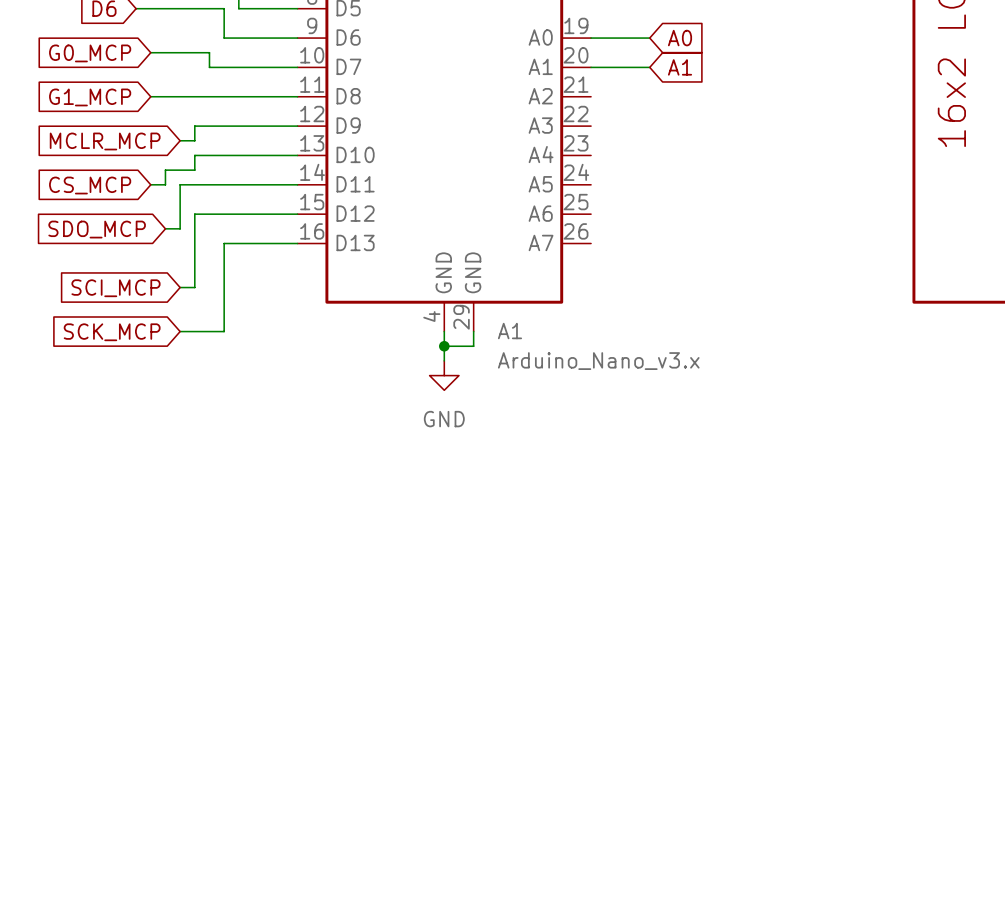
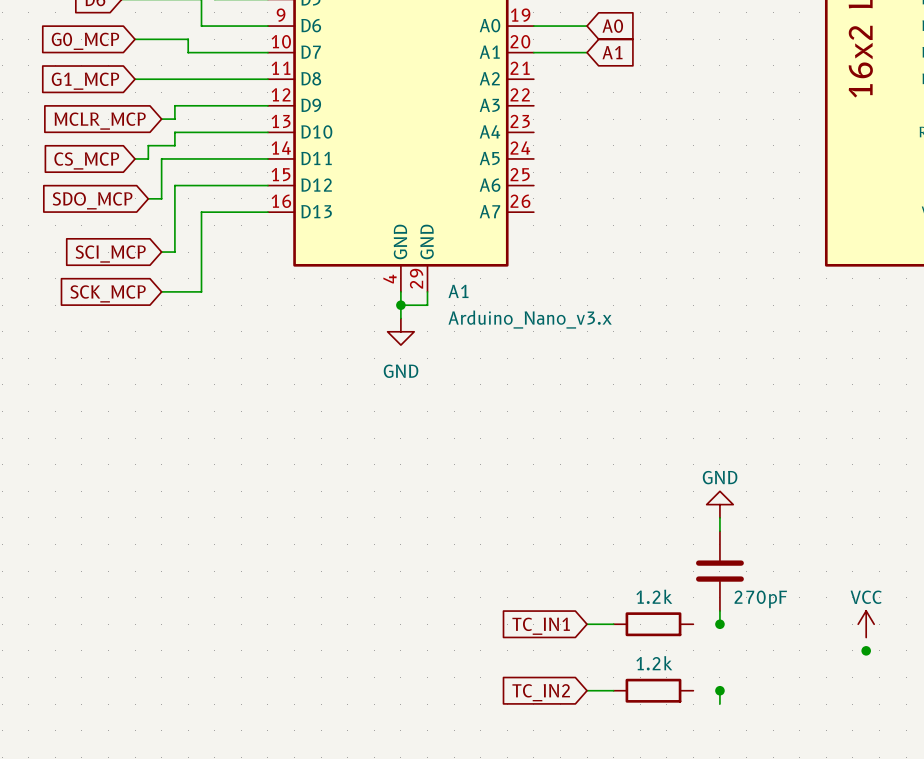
power symbol: none -> GND (719, 504)
wire: none -> (719, 517) (719, 531)
part: none -> 270pF (719, 571)
wire: none -> (719, 610) (719, 624)
wire: none -> (587, 624) (613, 624)
part: none -> 1.2k (653, 624)
junction: none -> (719, 624)
power symbol: none -> VCC (866, 624)
global label: none -> TC_IN1 (541, 626)
junction: none -> (866, 650)
wire: none -> (587, 690) (613, 690)
part: none -> 1.2k (653, 690)
wire: none -> (719, 690) (719, 704)
junction: none -> (719, 690)
global label: none -> TC_IN2 (541, 692)

